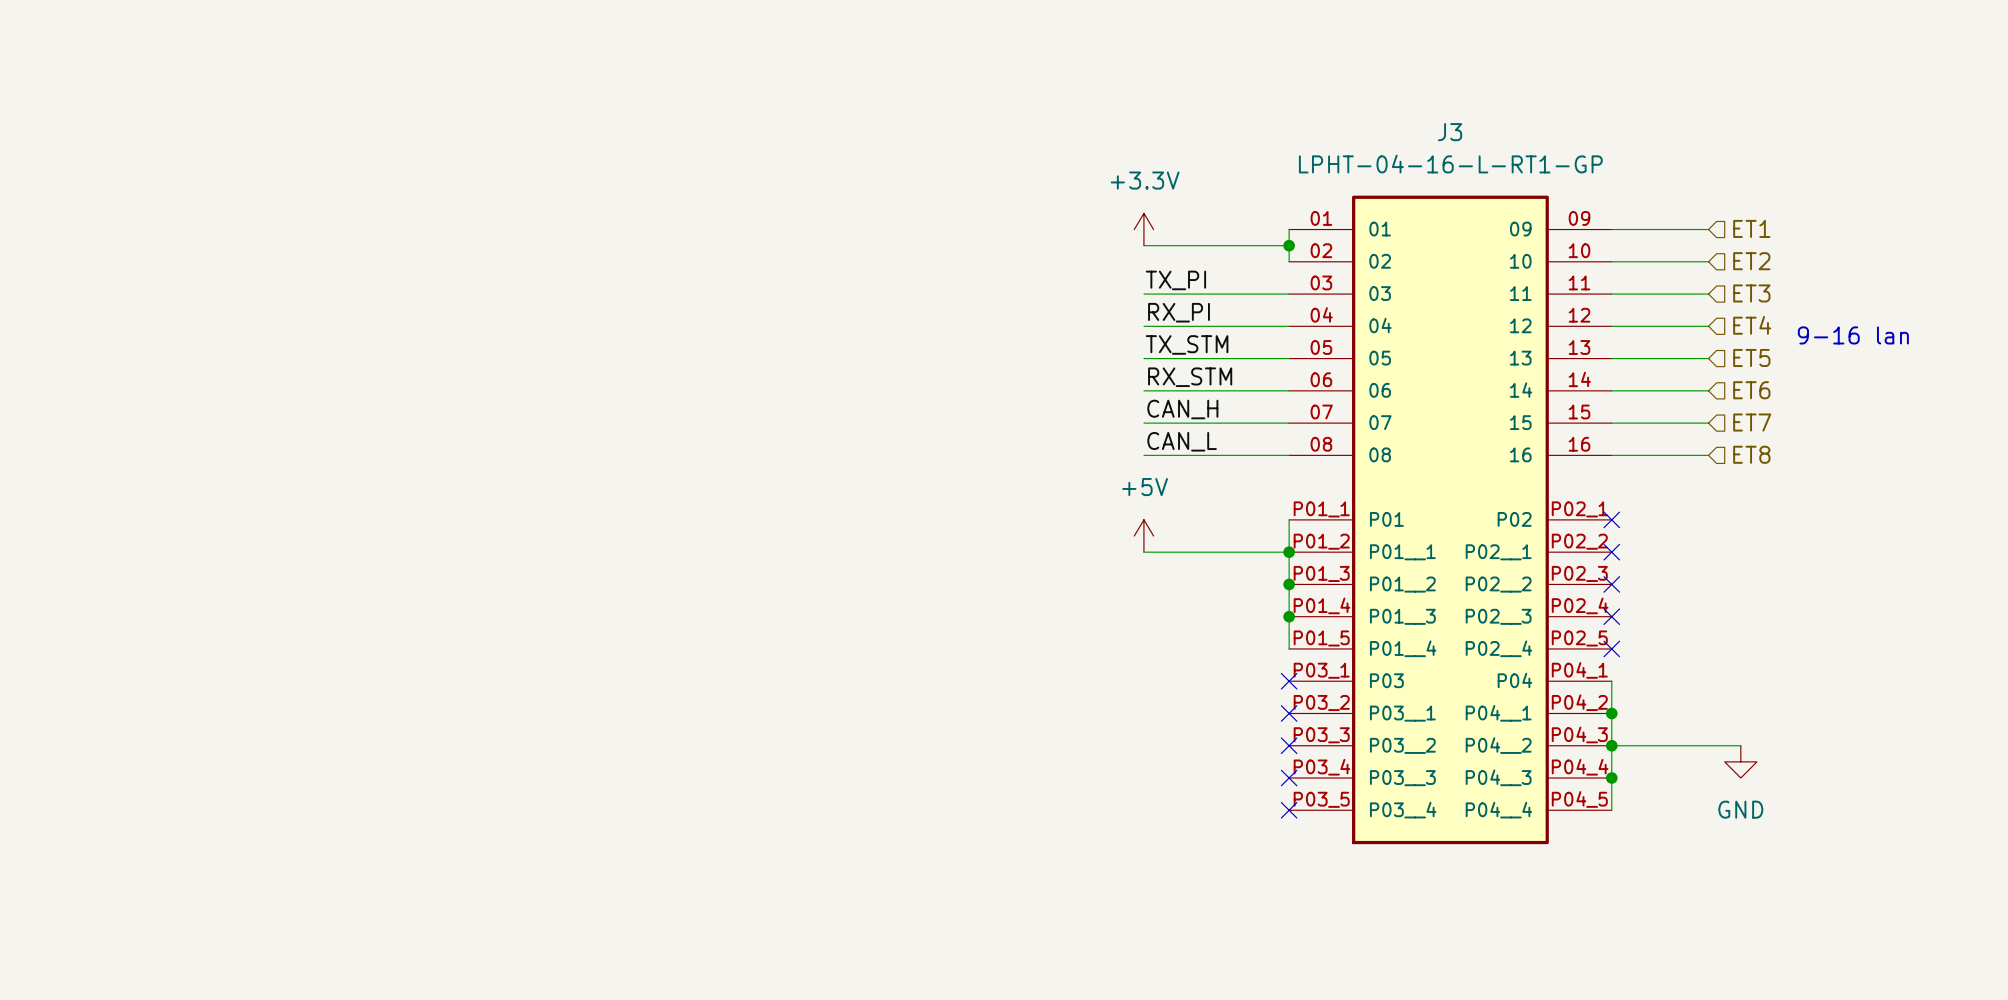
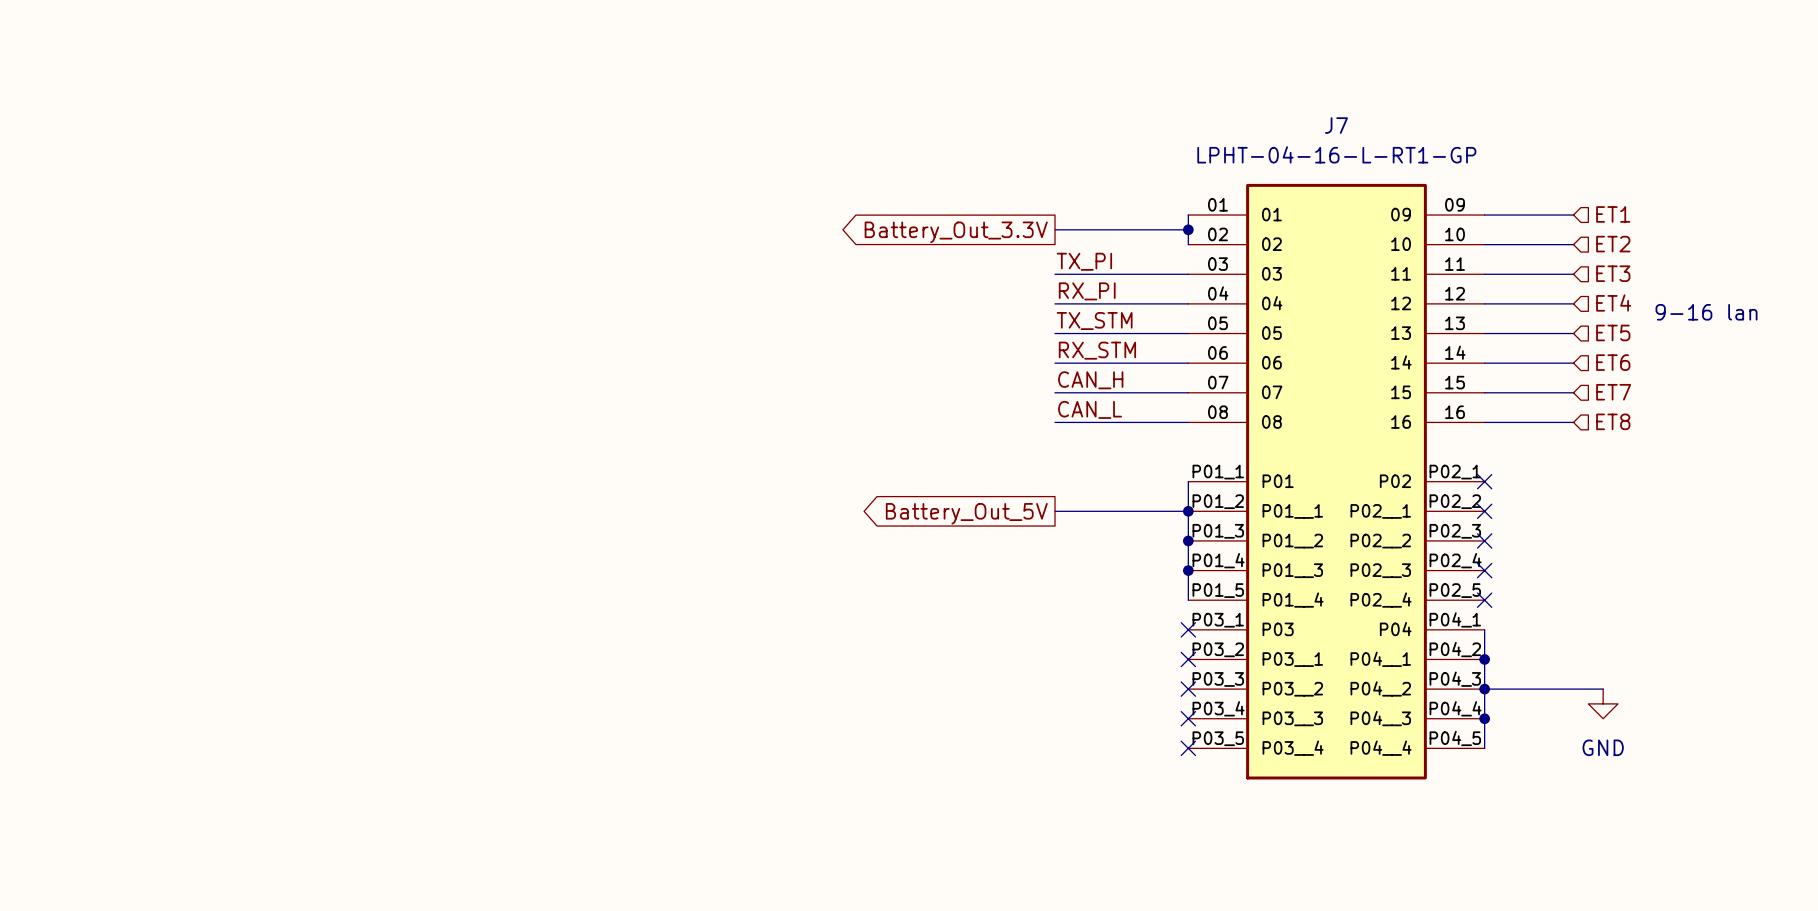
J3 name: J3 (1450, 132) -> J7 (1336, 125)
power symbol: +3.3V (1143, 229) -> none
global label: none -> Battery_Out_3.3V (956, 232)
power symbol: +5V (1143, 536) -> none
global label: none -> Battery_Out_5V (966, 513)

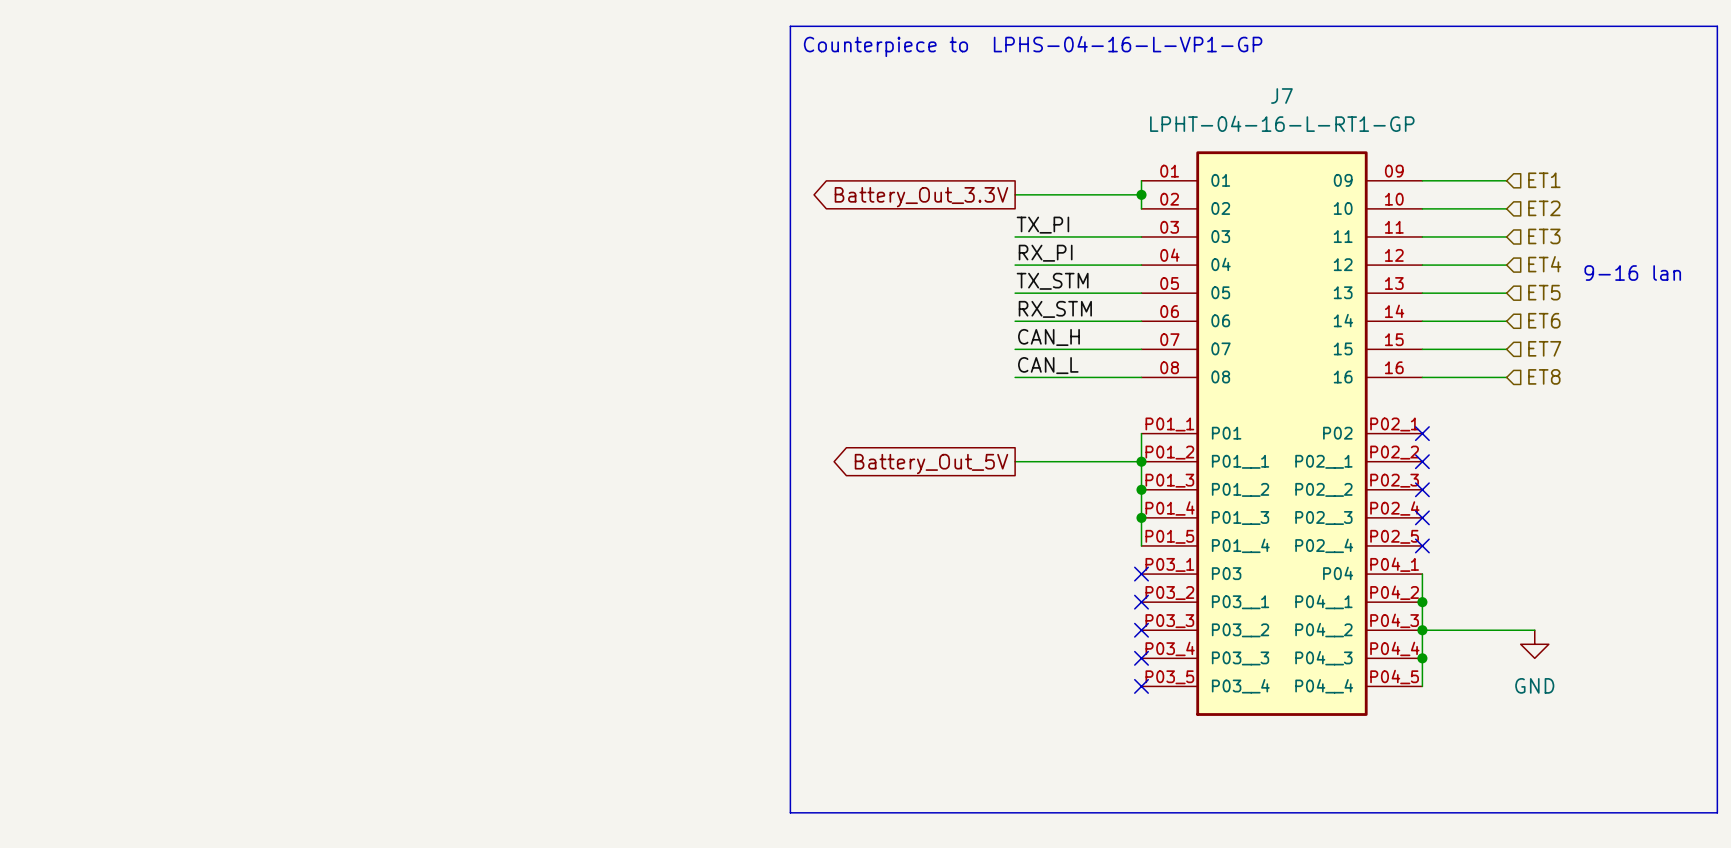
line: none -> (790, 26) (1717, 26) (1717, 812) (790, 812) (790, 26)
text: none -> Counterpiece to LPHS-04-16-L-VP1-GP (1033, 46)

